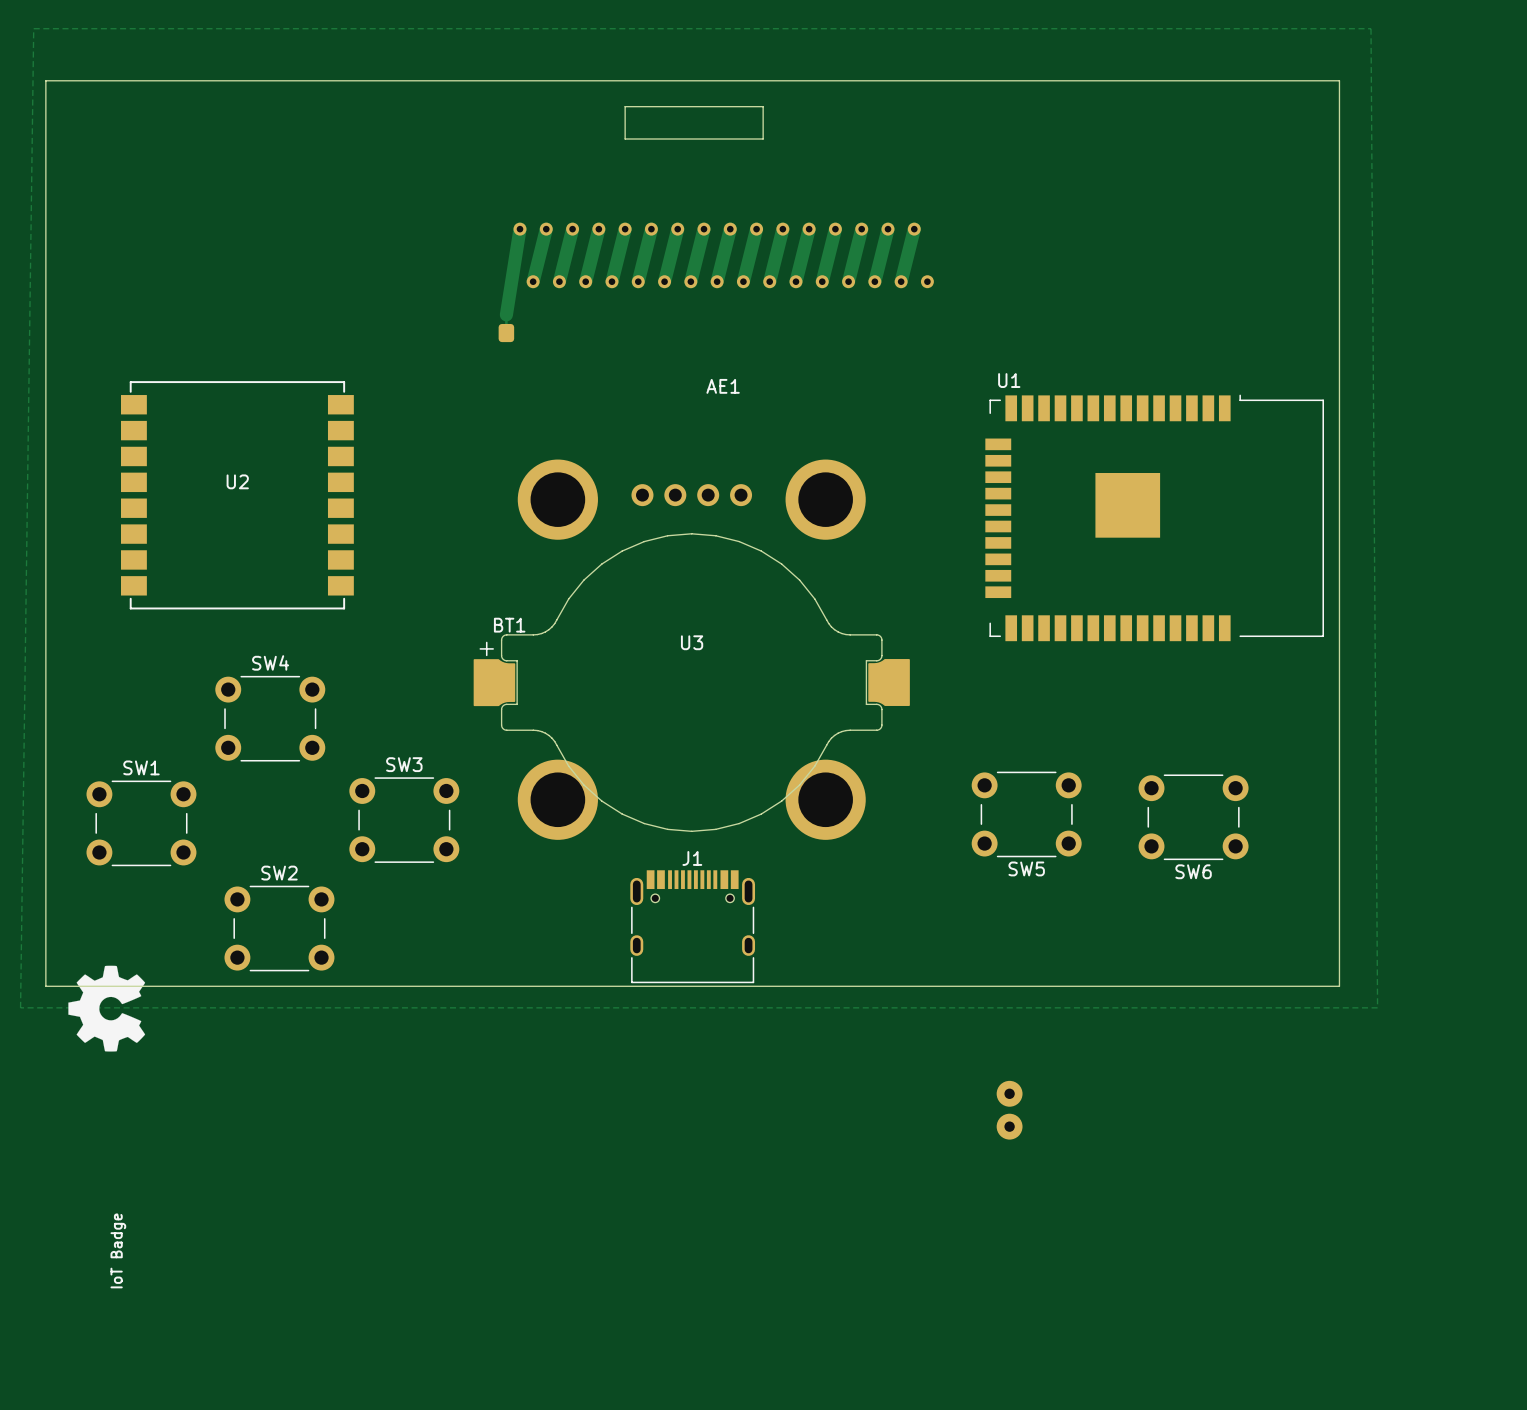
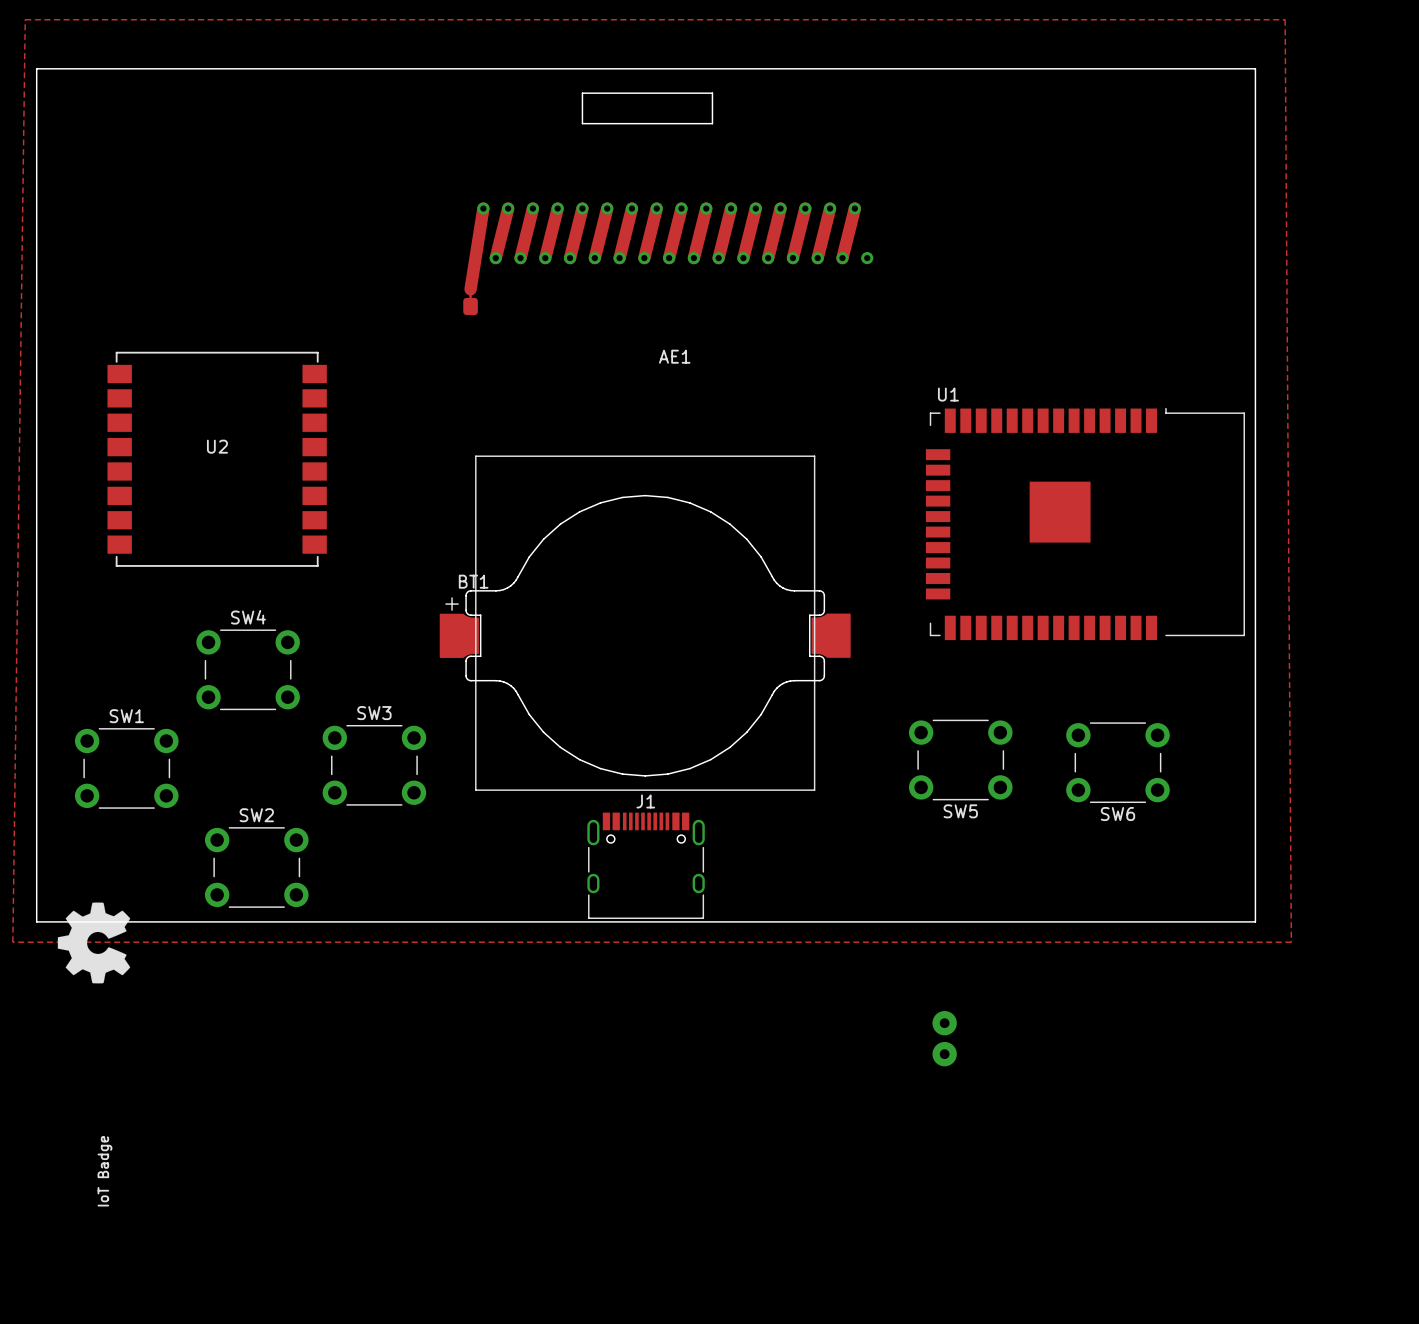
line: none -> (475, 456) (475, 790) (814, 790) (814, 456) (475, 456)
U1 position: (1154, 517) -> (1085, 523)
U3: (691, 649) -> none

